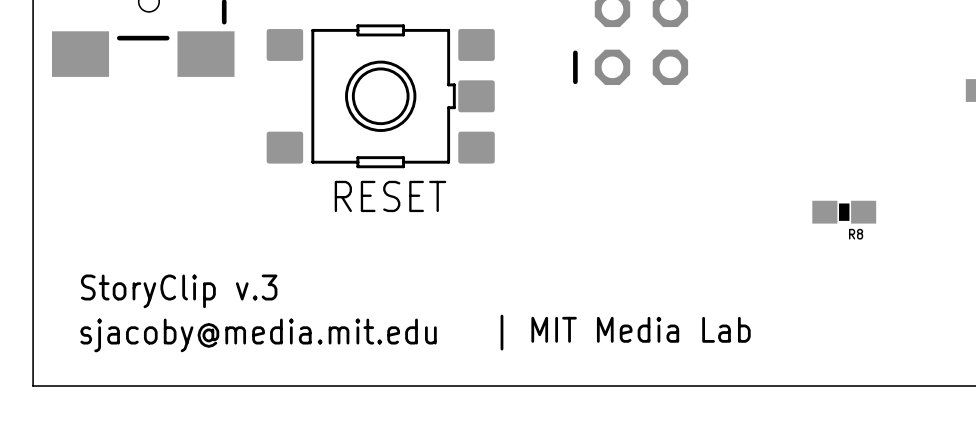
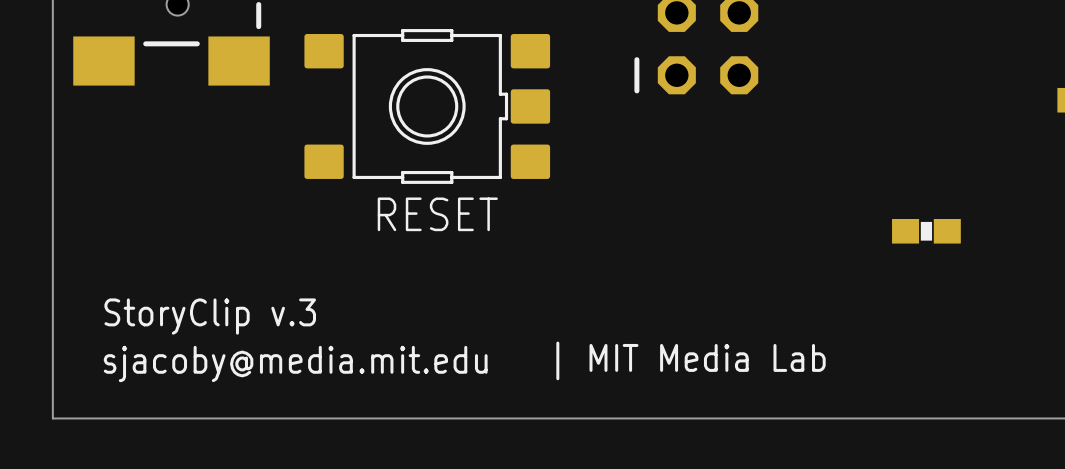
R8 name: R8 (856, 234) -> none

